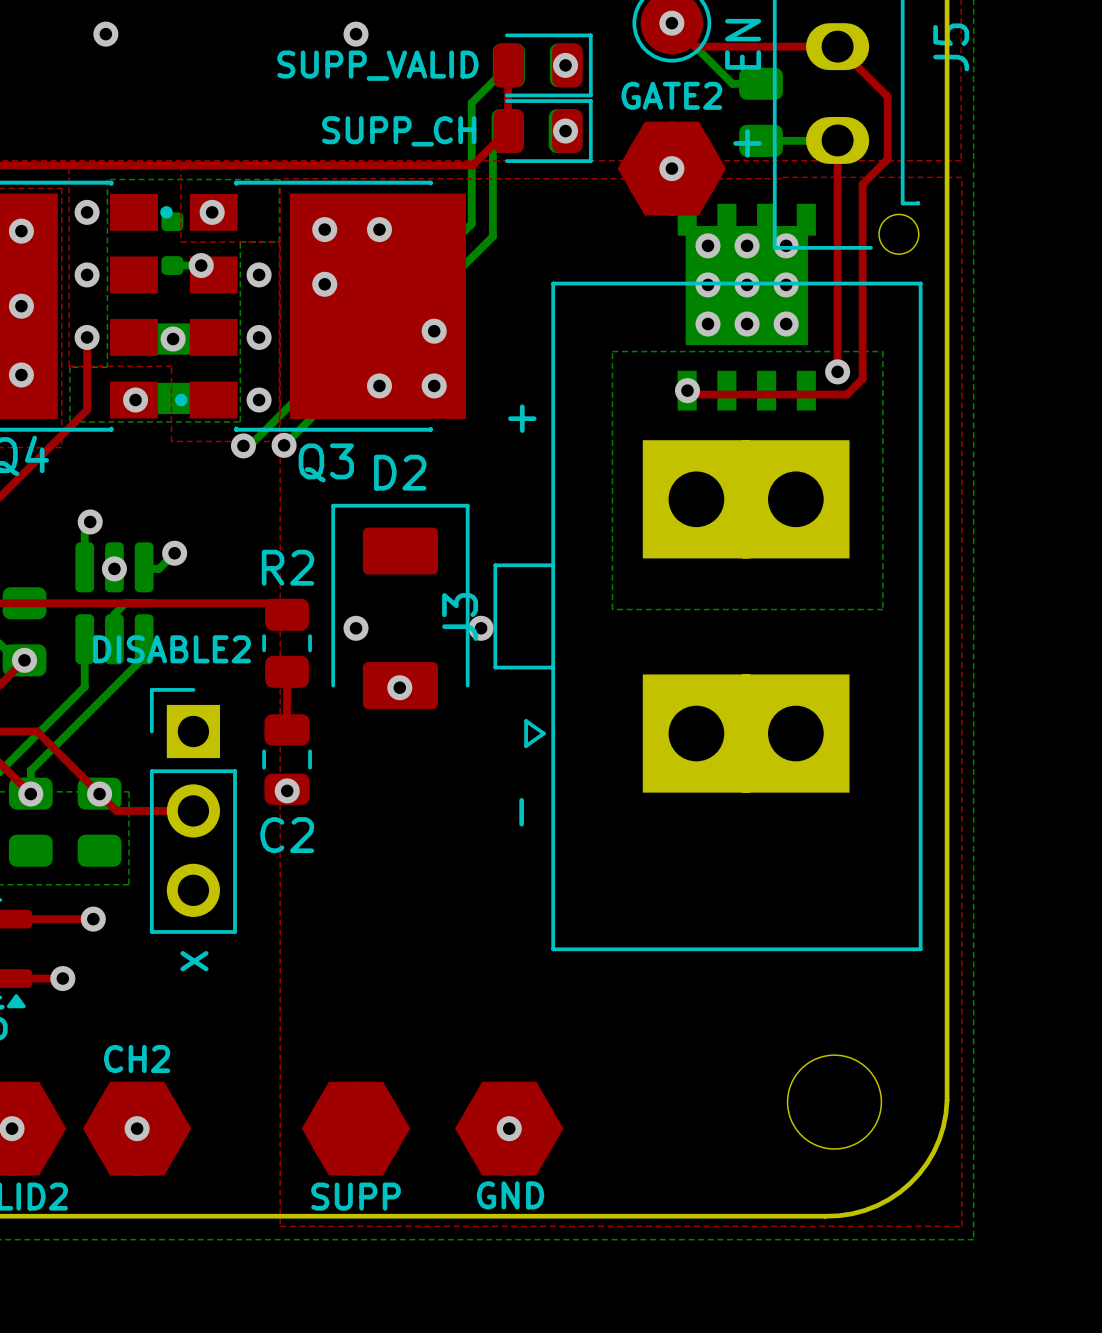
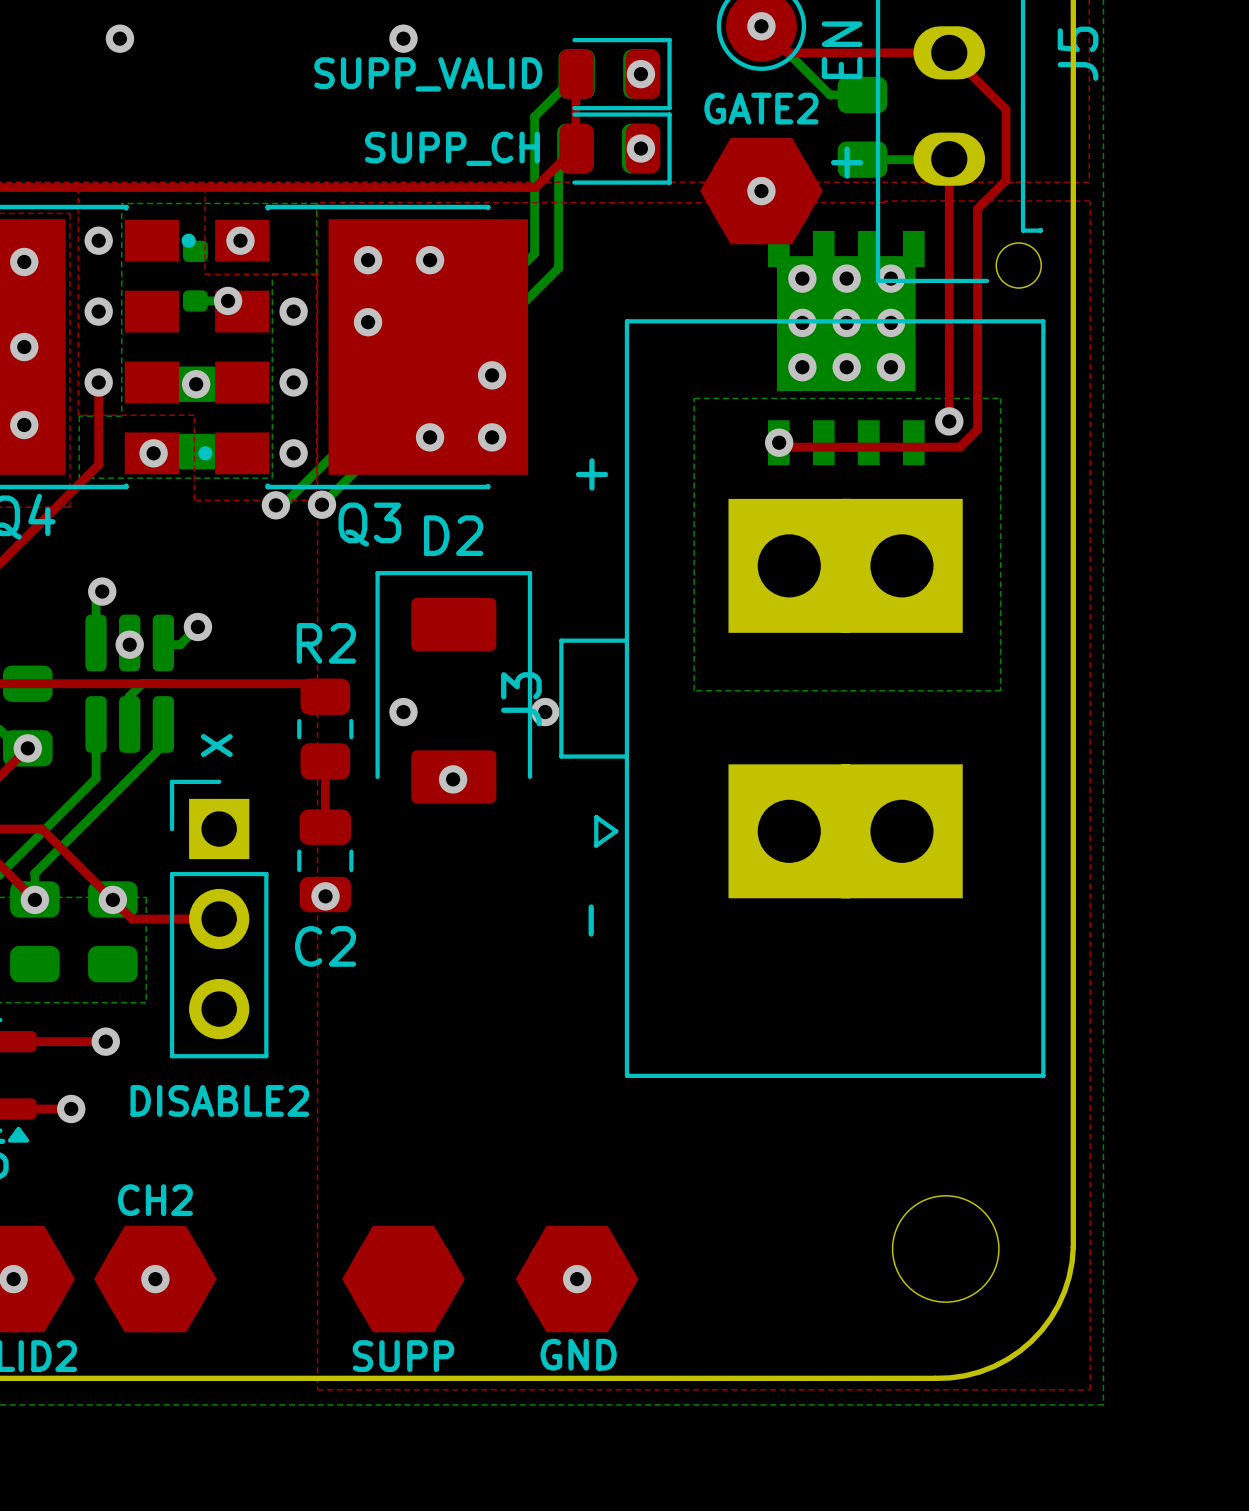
DISABLE2 name position: DISABLE2 (172, 649) -> DISABLE2 (219, 1100)
text position: X (194, 961) -> X (216, 745)

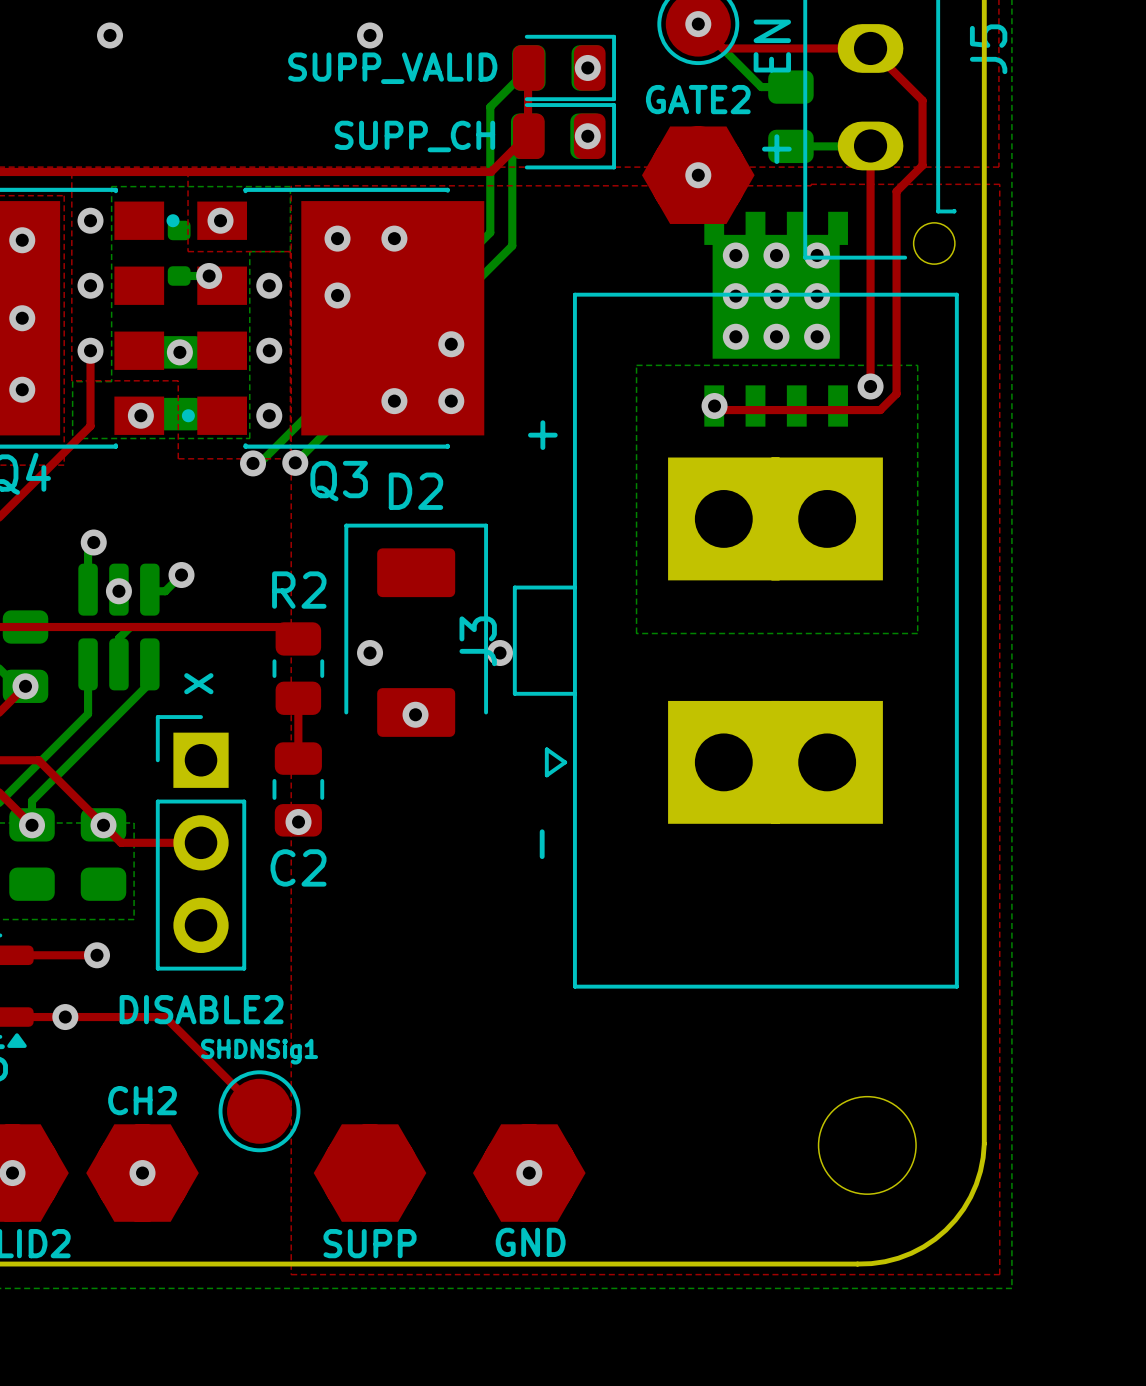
top track: none -> (65, 1017) (165, 1017) (259, 1111)
SHDNSig1: none -> (259, 1111)

